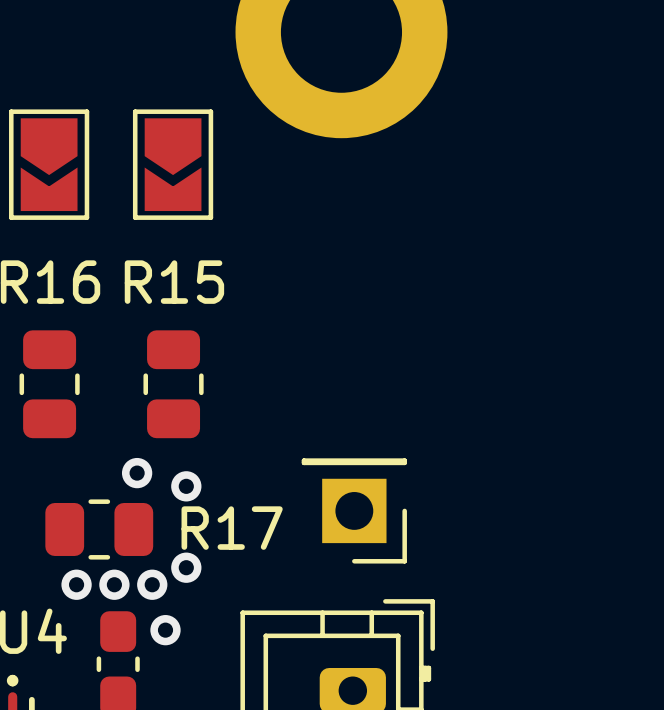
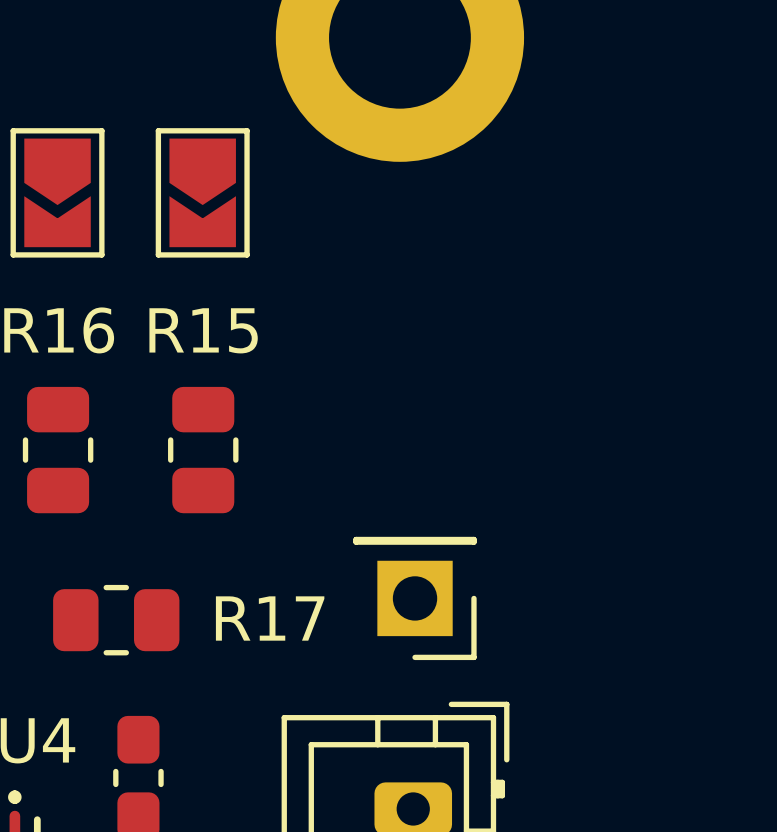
via: (137, 473) -> none
via: (186, 486) -> none
via: (186, 567) -> none
via: (76, 584) -> none
via: (114, 584) -> none
via: (152, 584) -> none
via: (165, 630) -> none

